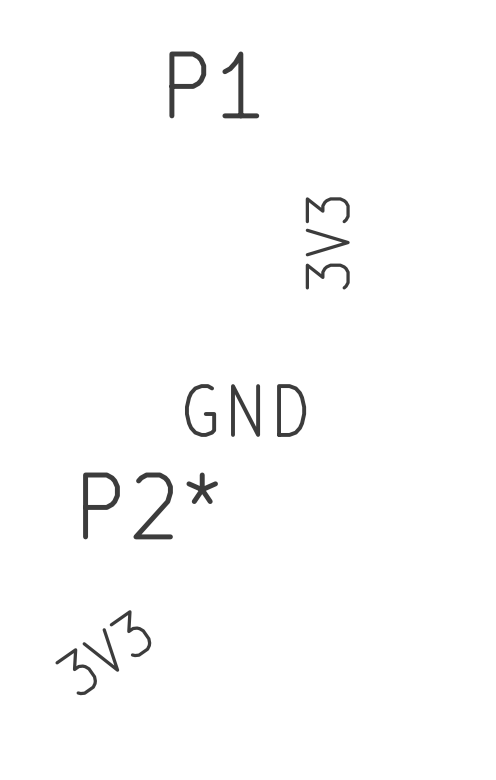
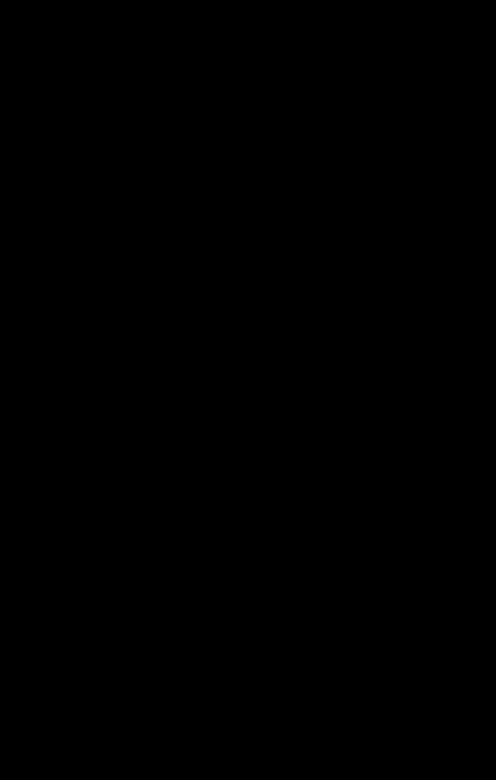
text: P1 (214, 84) -> none
text: 3V3 (327, 243) -> none
text: GND (245, 410) -> none
text: P2* (150, 505) -> none
text: 3V3 (103, 652) -> none

